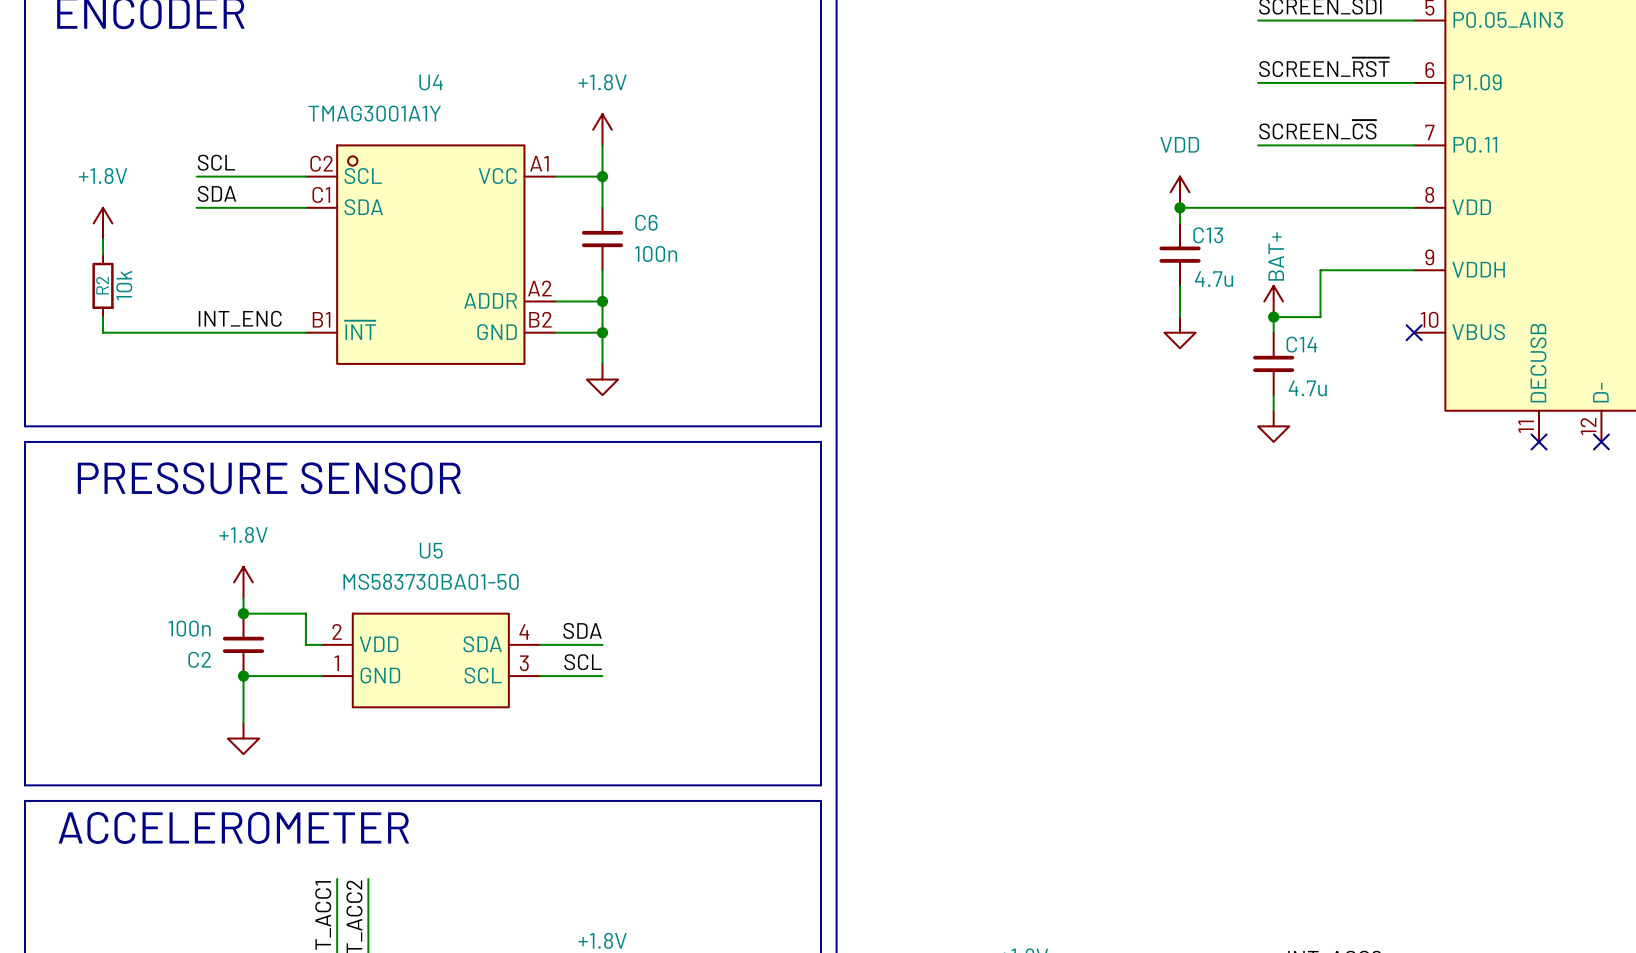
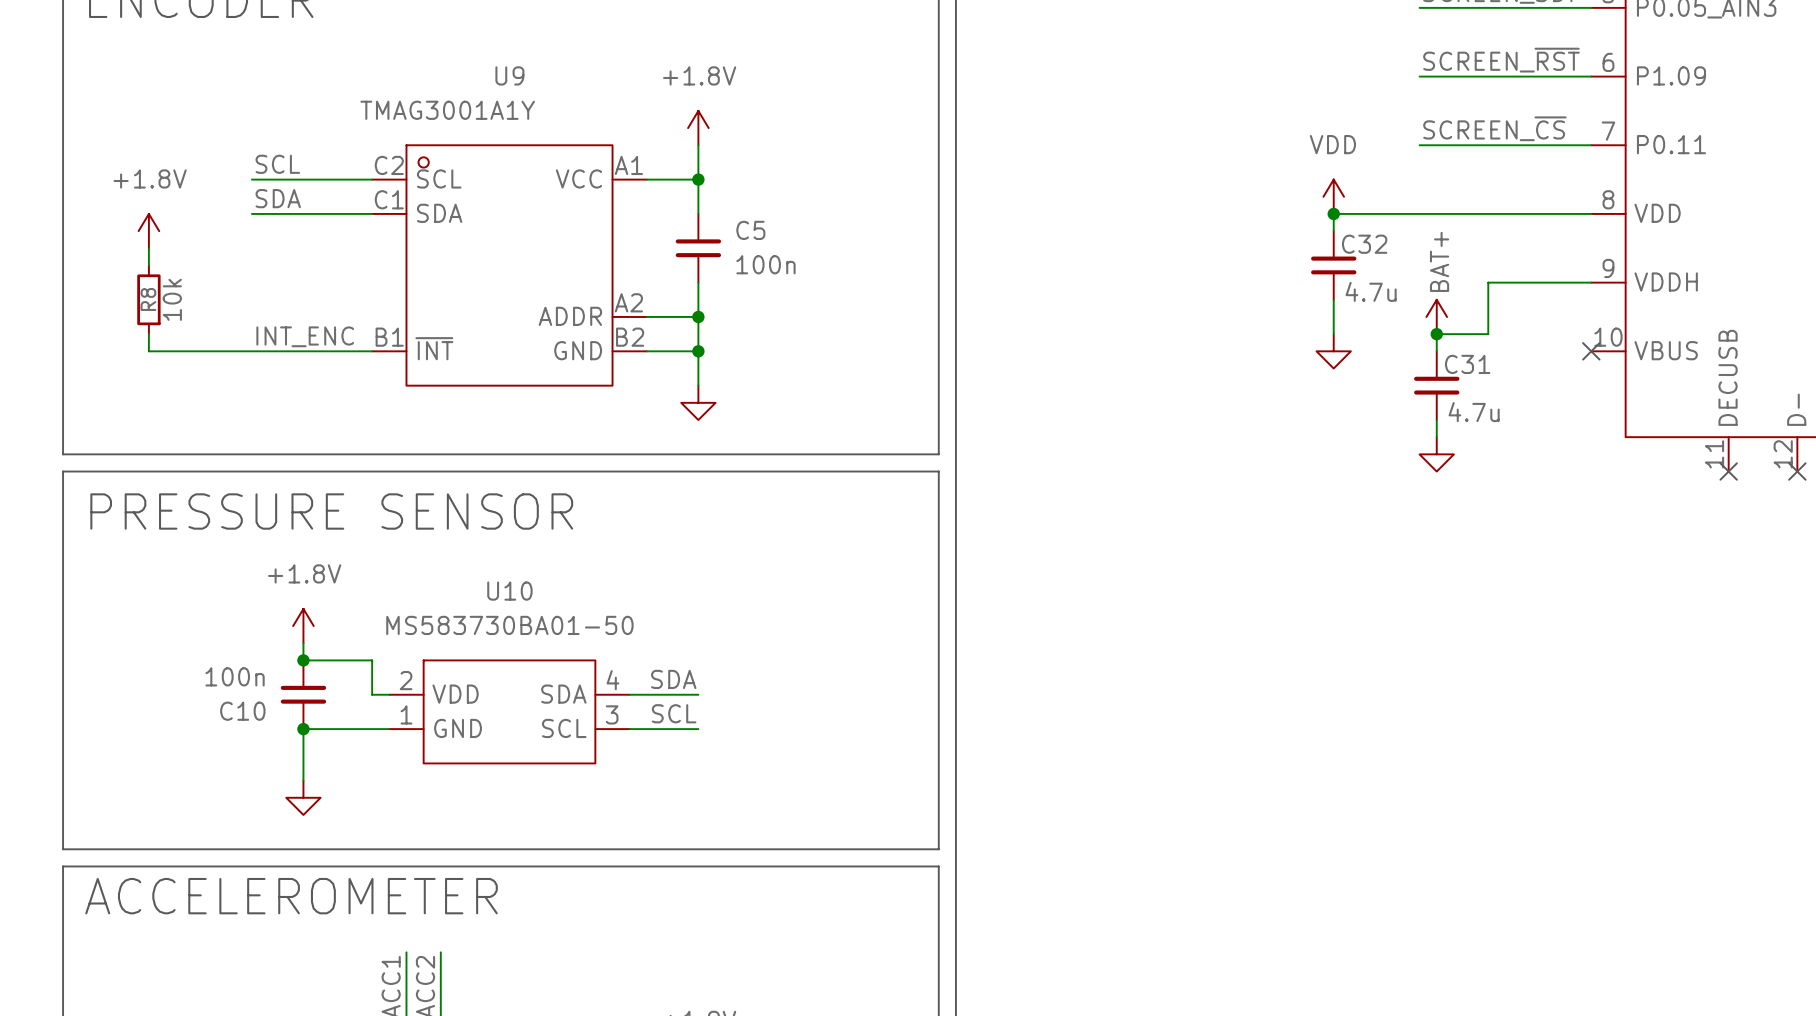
U4 name: U4 (431, 82) -> U9 (509, 75)
C6 name: C6 (646, 222) -> C5 (750, 230)
C13 name: C13 (1208, 235) -> C32 (1364, 244)
R2 name: R2 (102, 285) -> R8 (148, 299)
C14 name: C14 (1301, 344) -> C31 (1467, 364)
U5 name: U5 (431, 550) -> U10 (509, 591)
C2 name: C2 (199, 659) -> C10 (242, 711)

